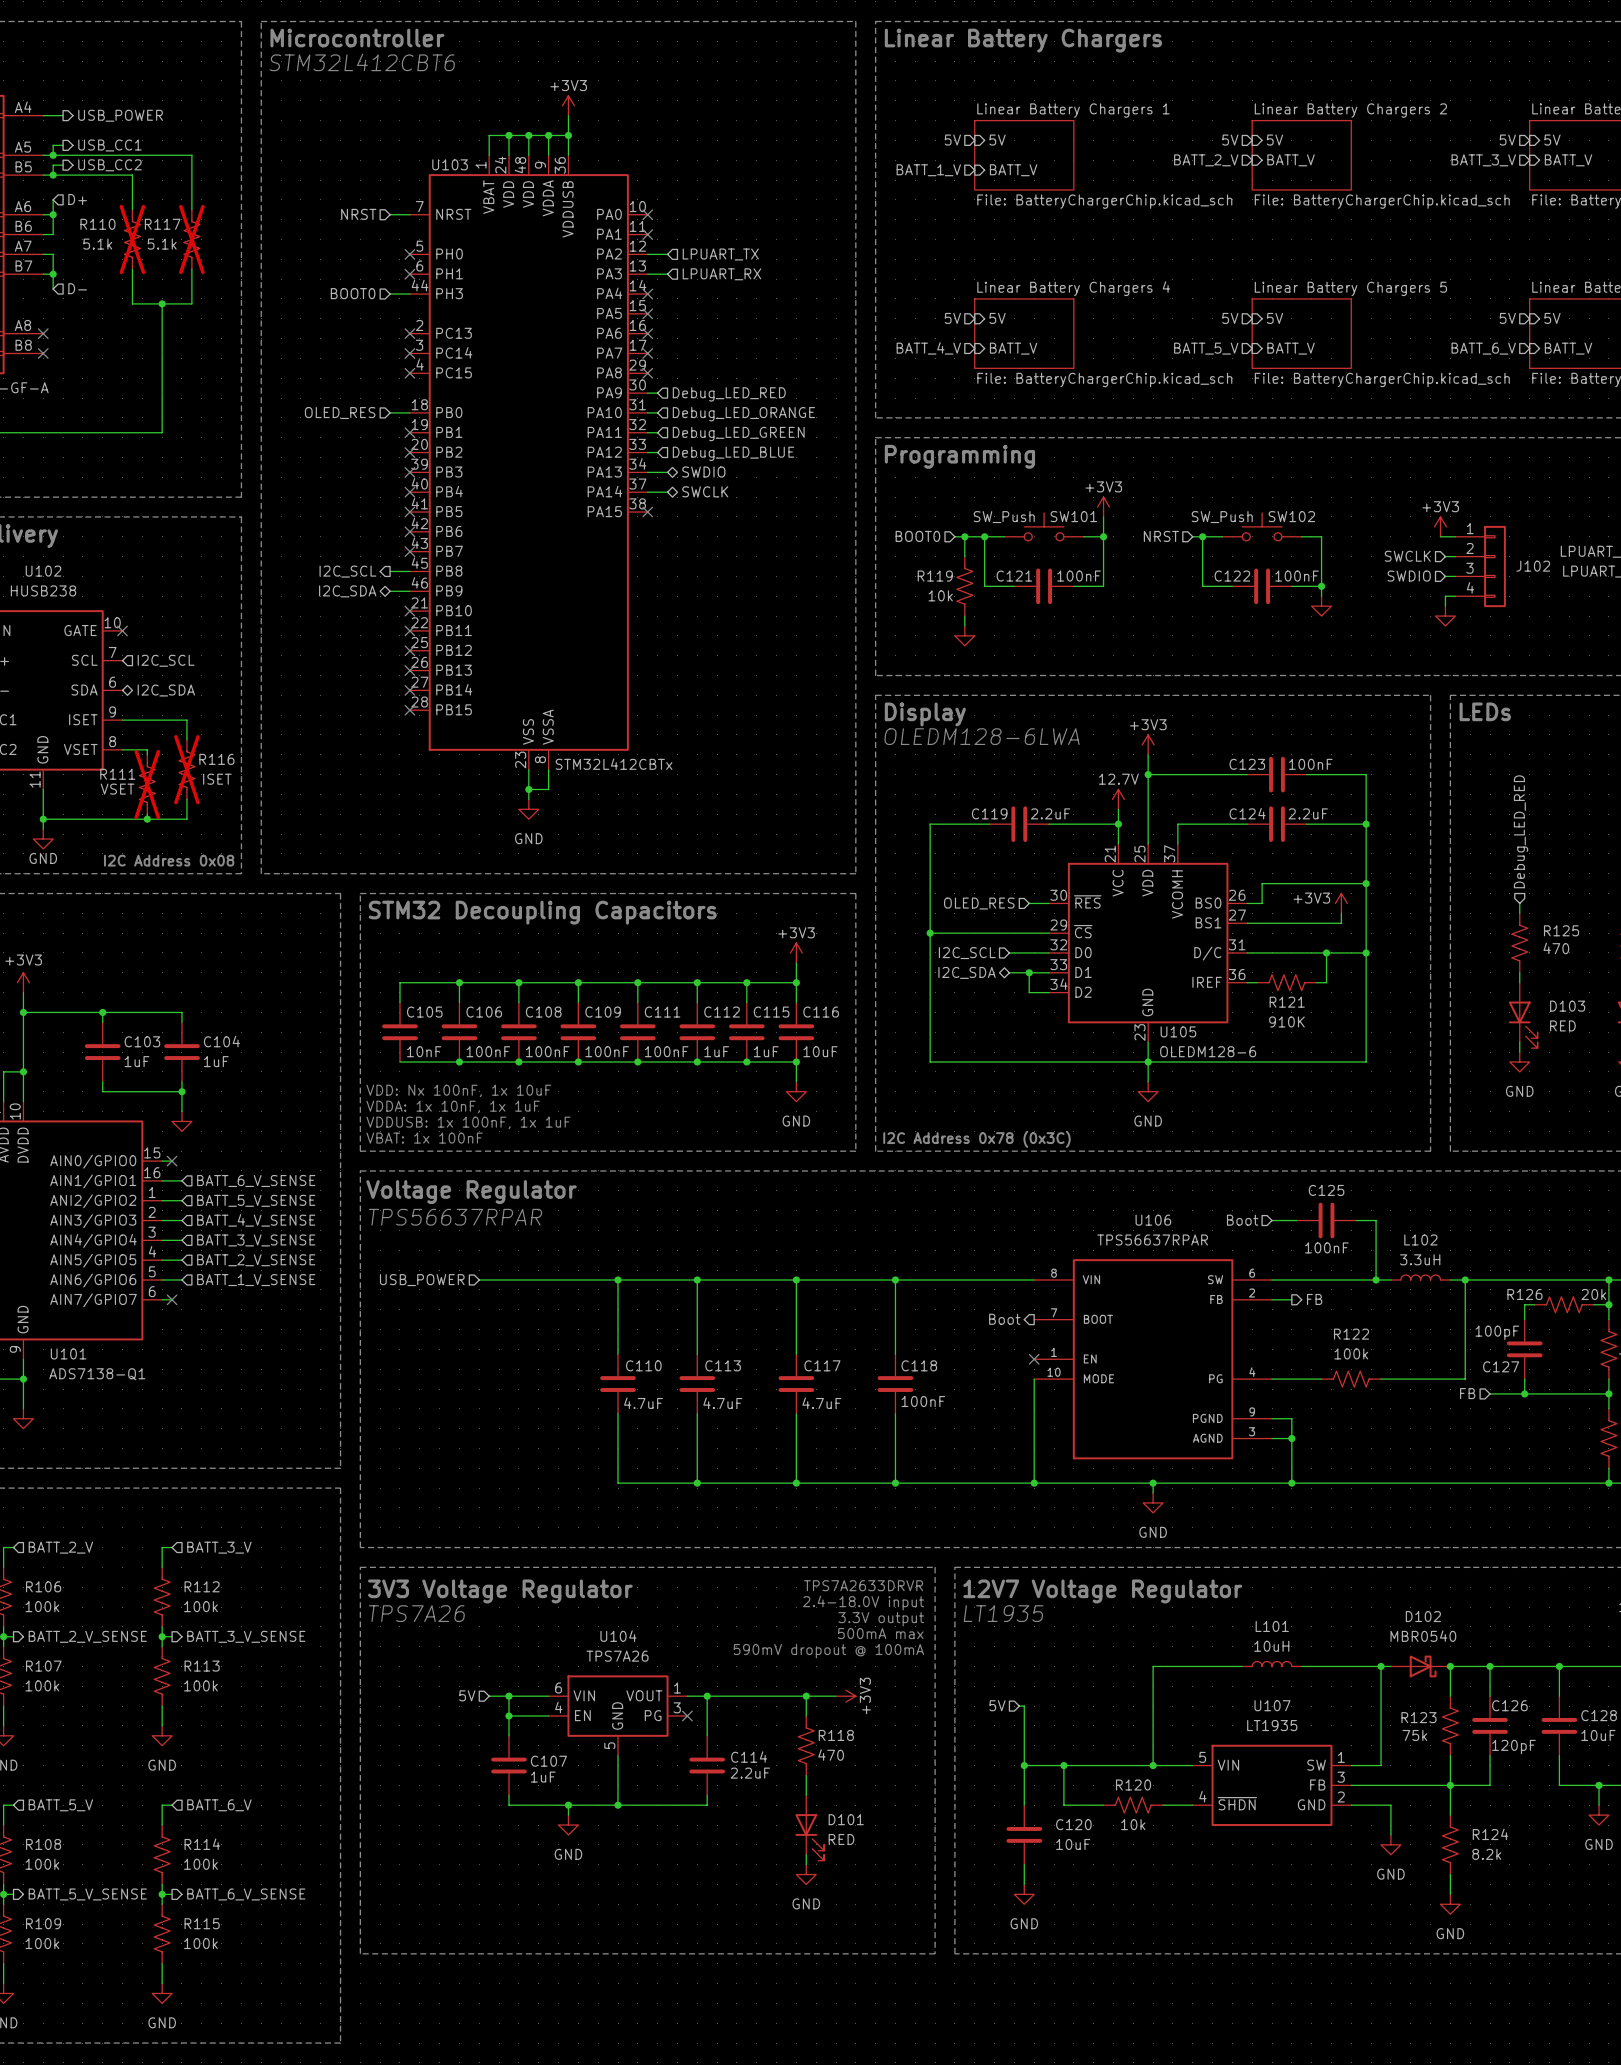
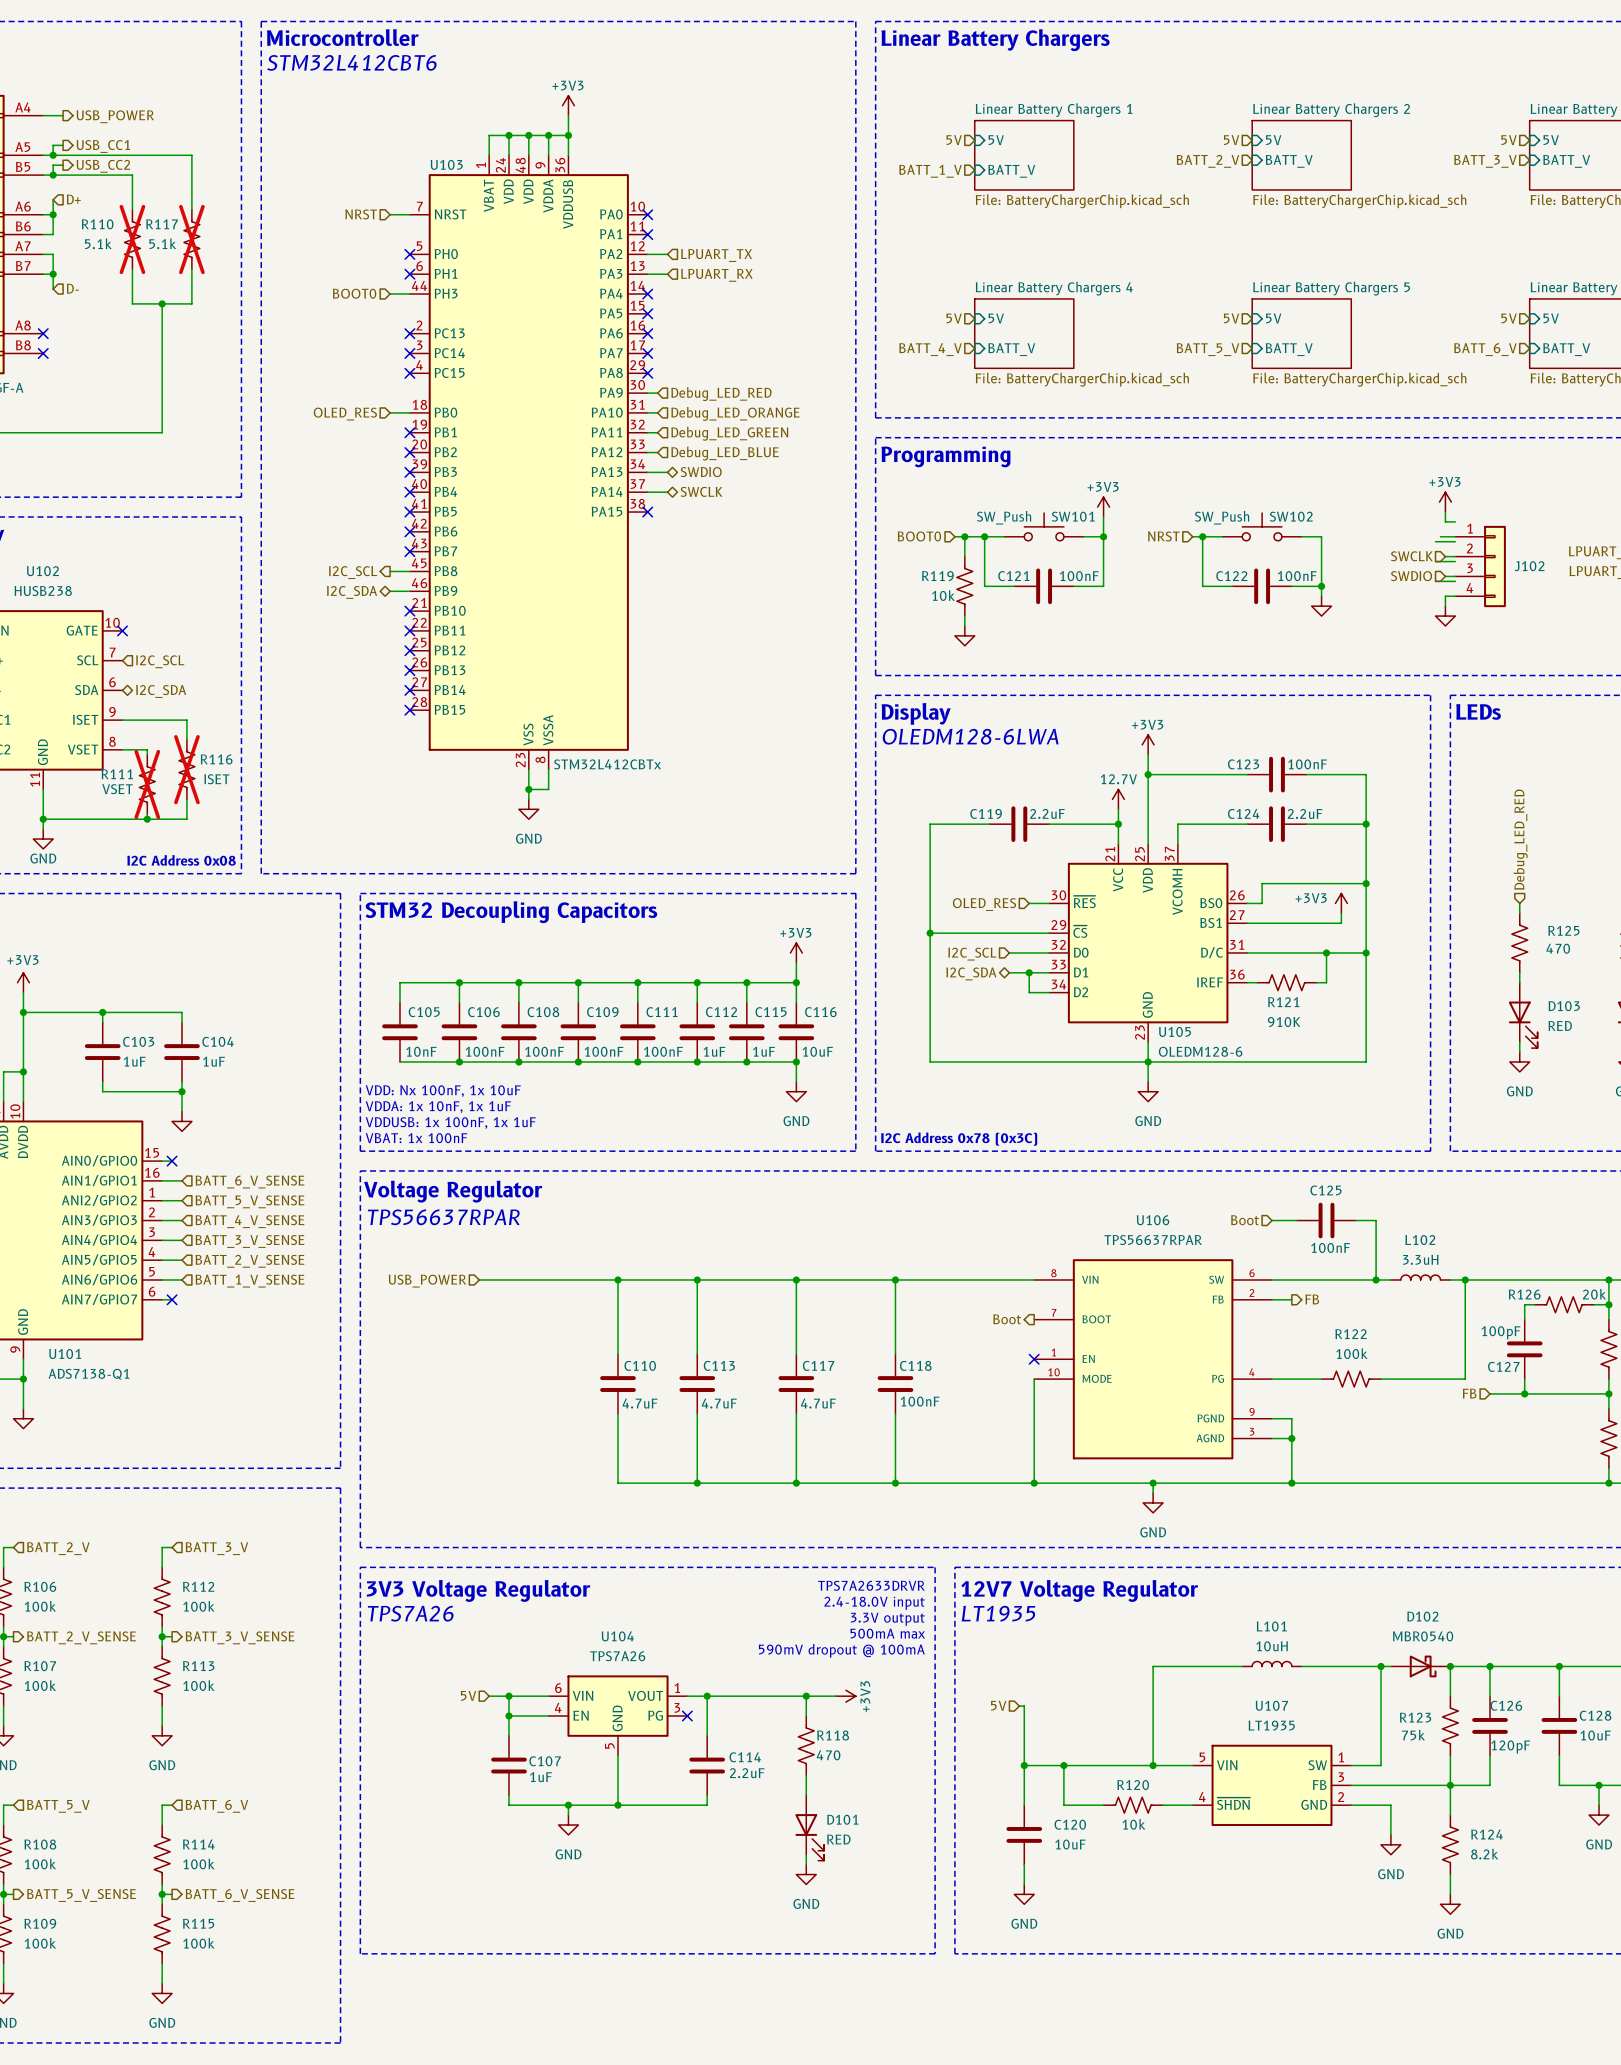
wire: none -> (1445, 512) (1445, 521) (1455, 521)
power symbol position: +3V3 (1440, 526) -> +3V3 (1445, 502)
wire: none -> (1435, 541) (1455, 541)
wire: none -> (1435, 561) (1455, 561)
wire: none -> (1435, 581) (1455, 581)

